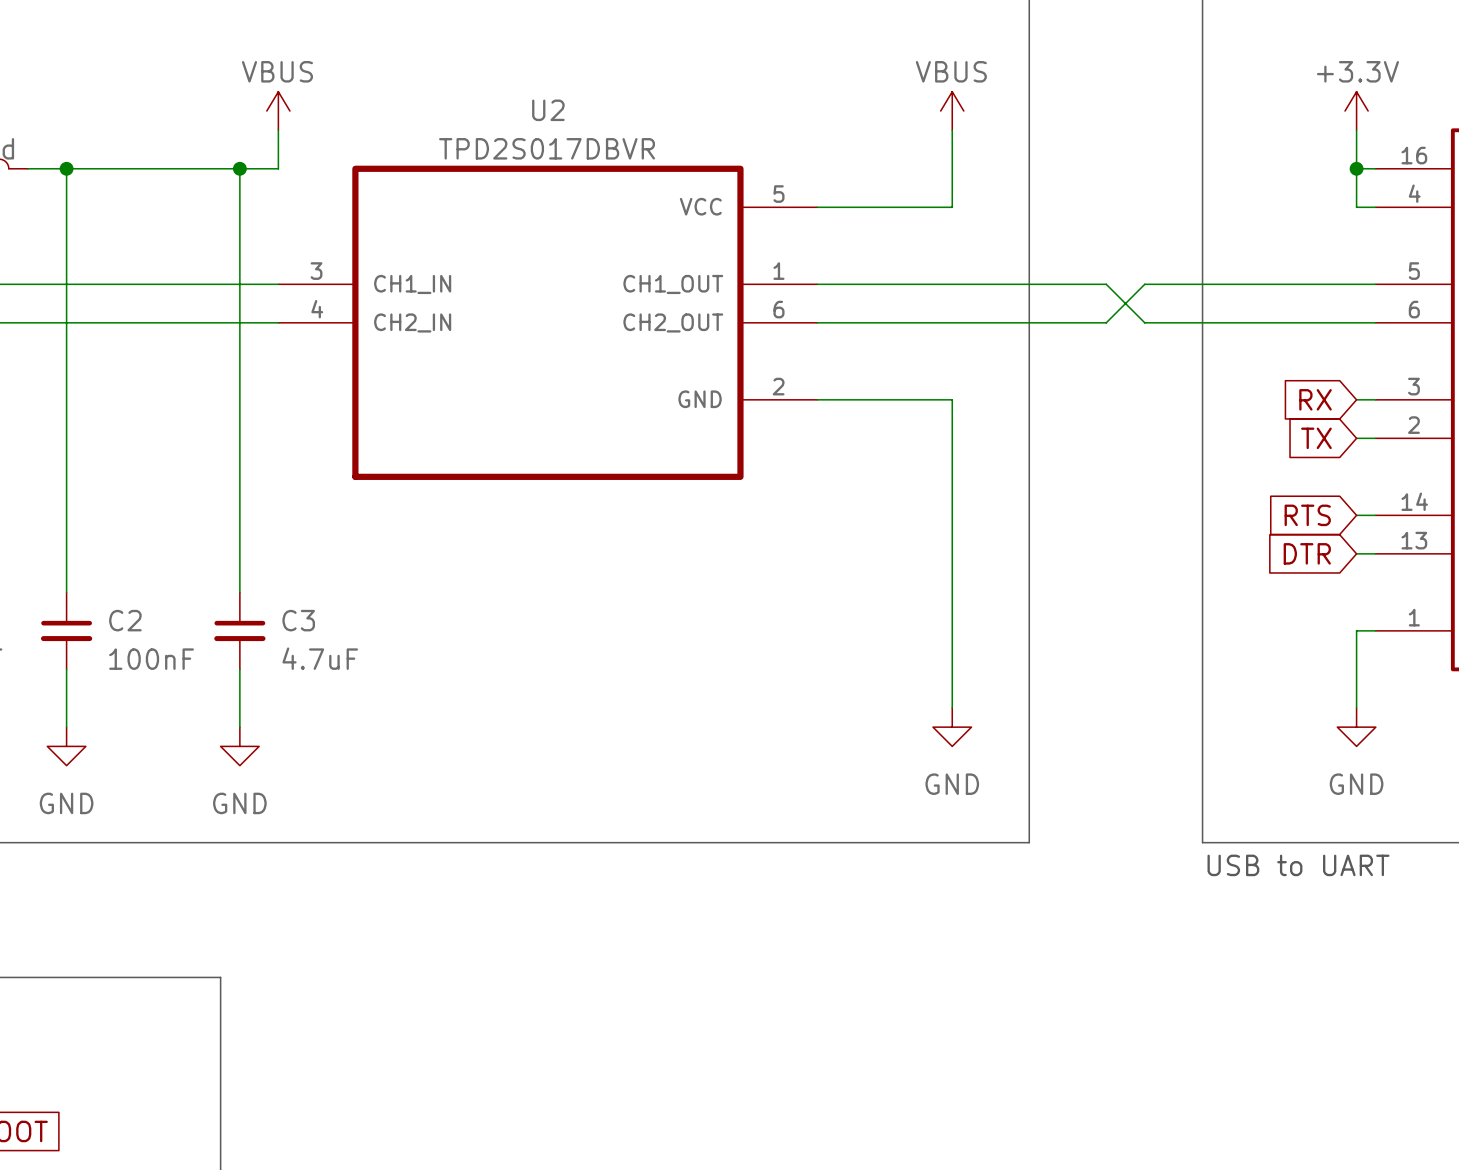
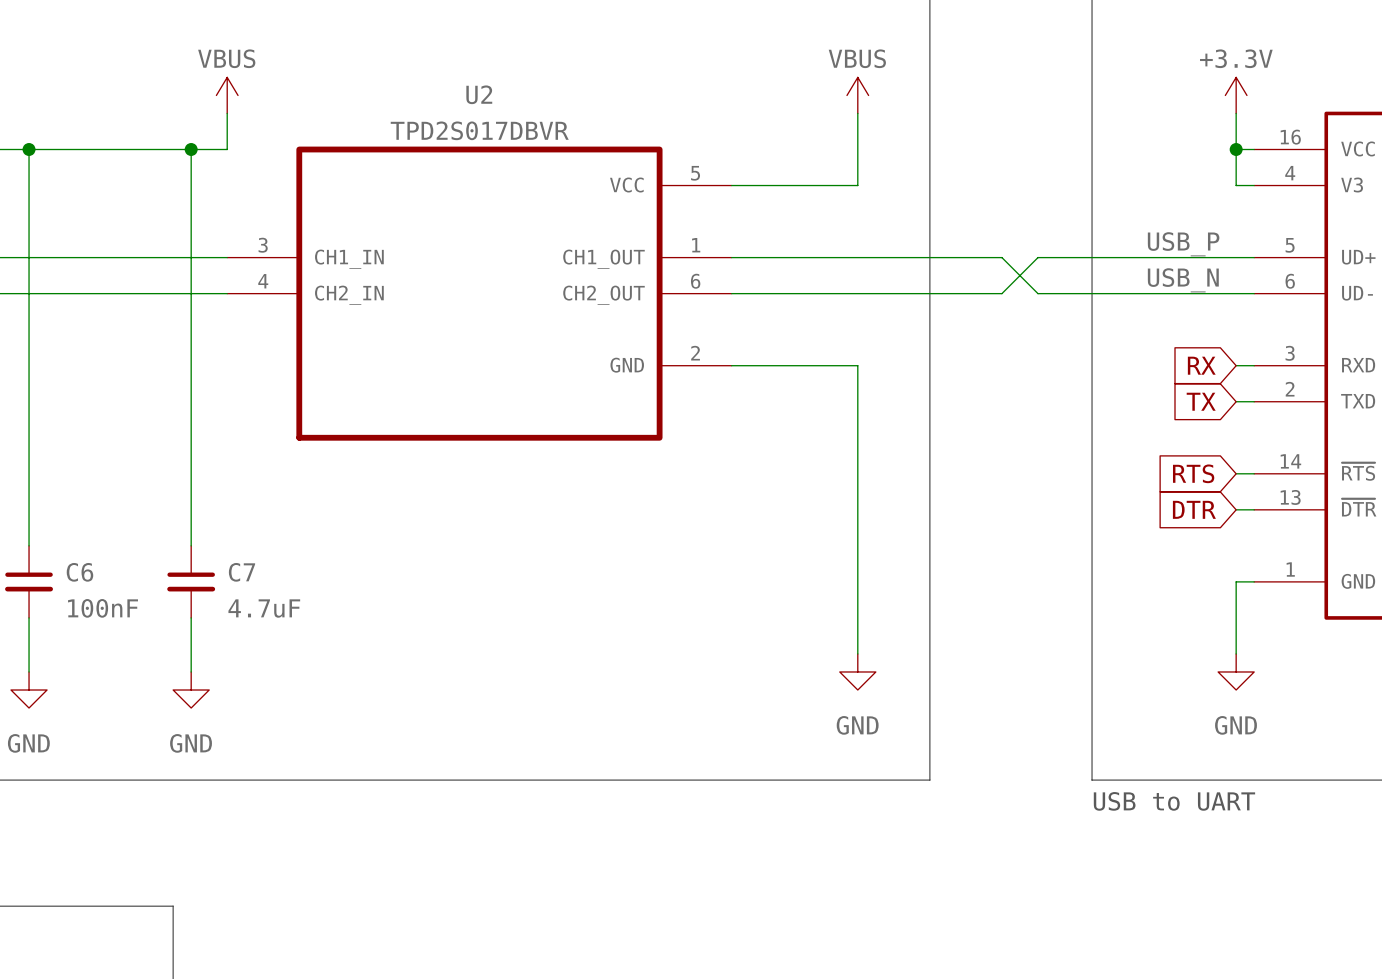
label: none -> USB_P (1183, 244)
label: none -> USB_N (1183, 280)
C2 name: C2 (125, 620) -> C6 (79, 572)
C3 name: C3 (298, 620) -> C7 (242, 572)

